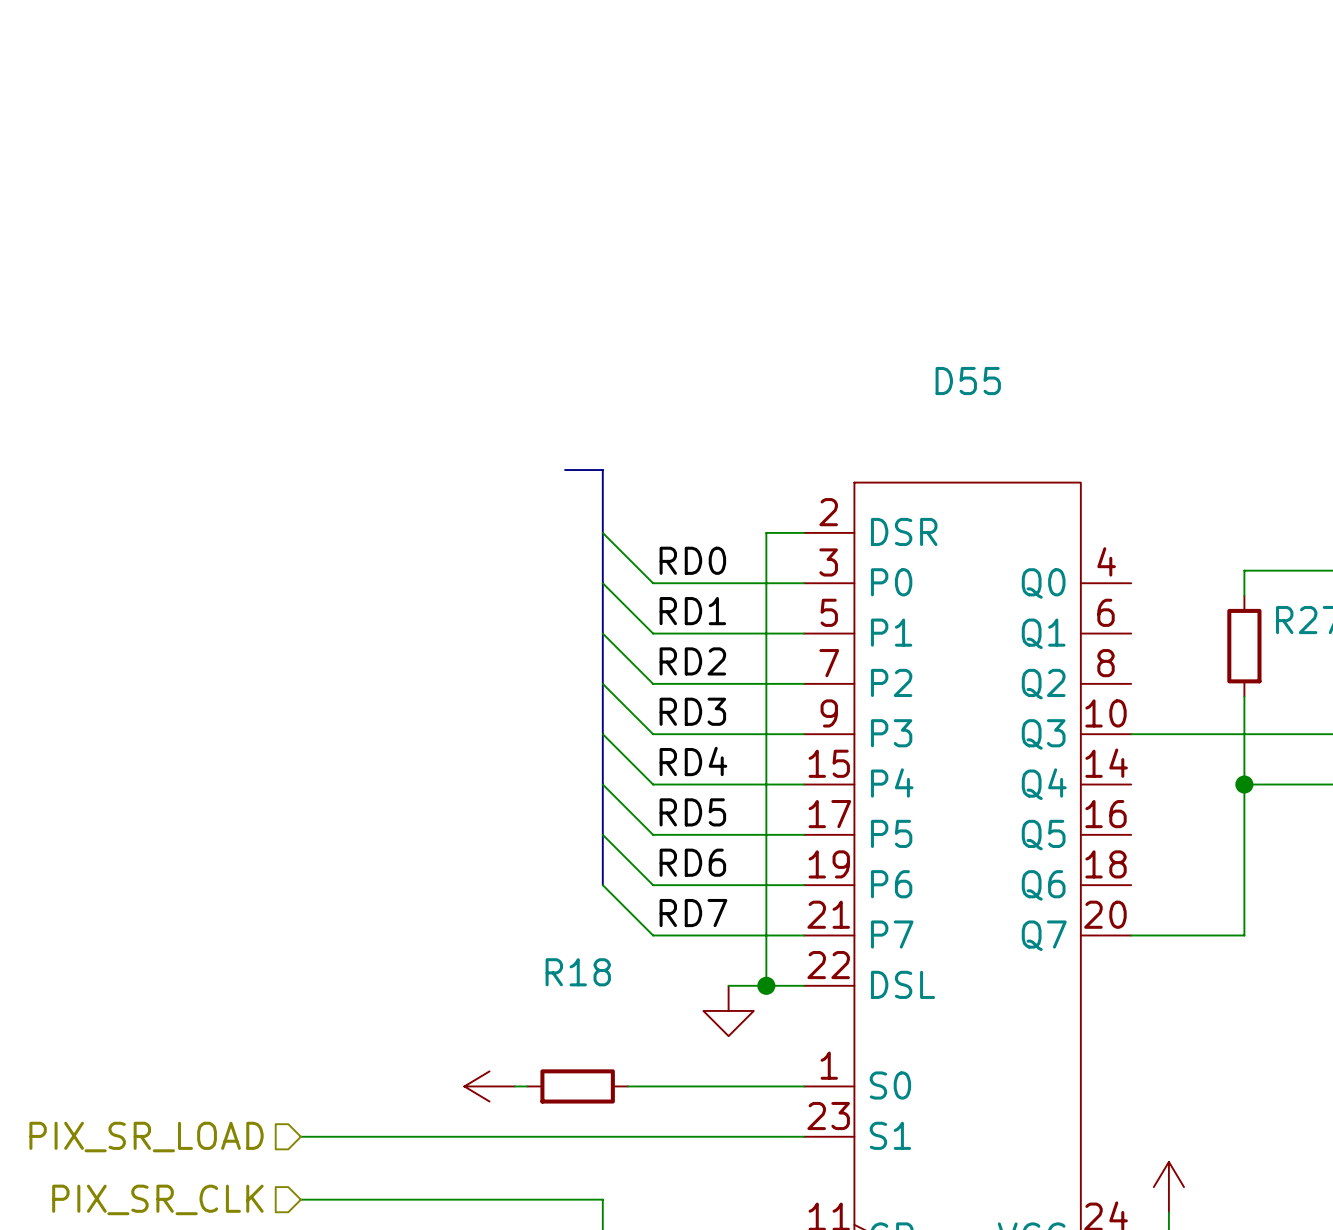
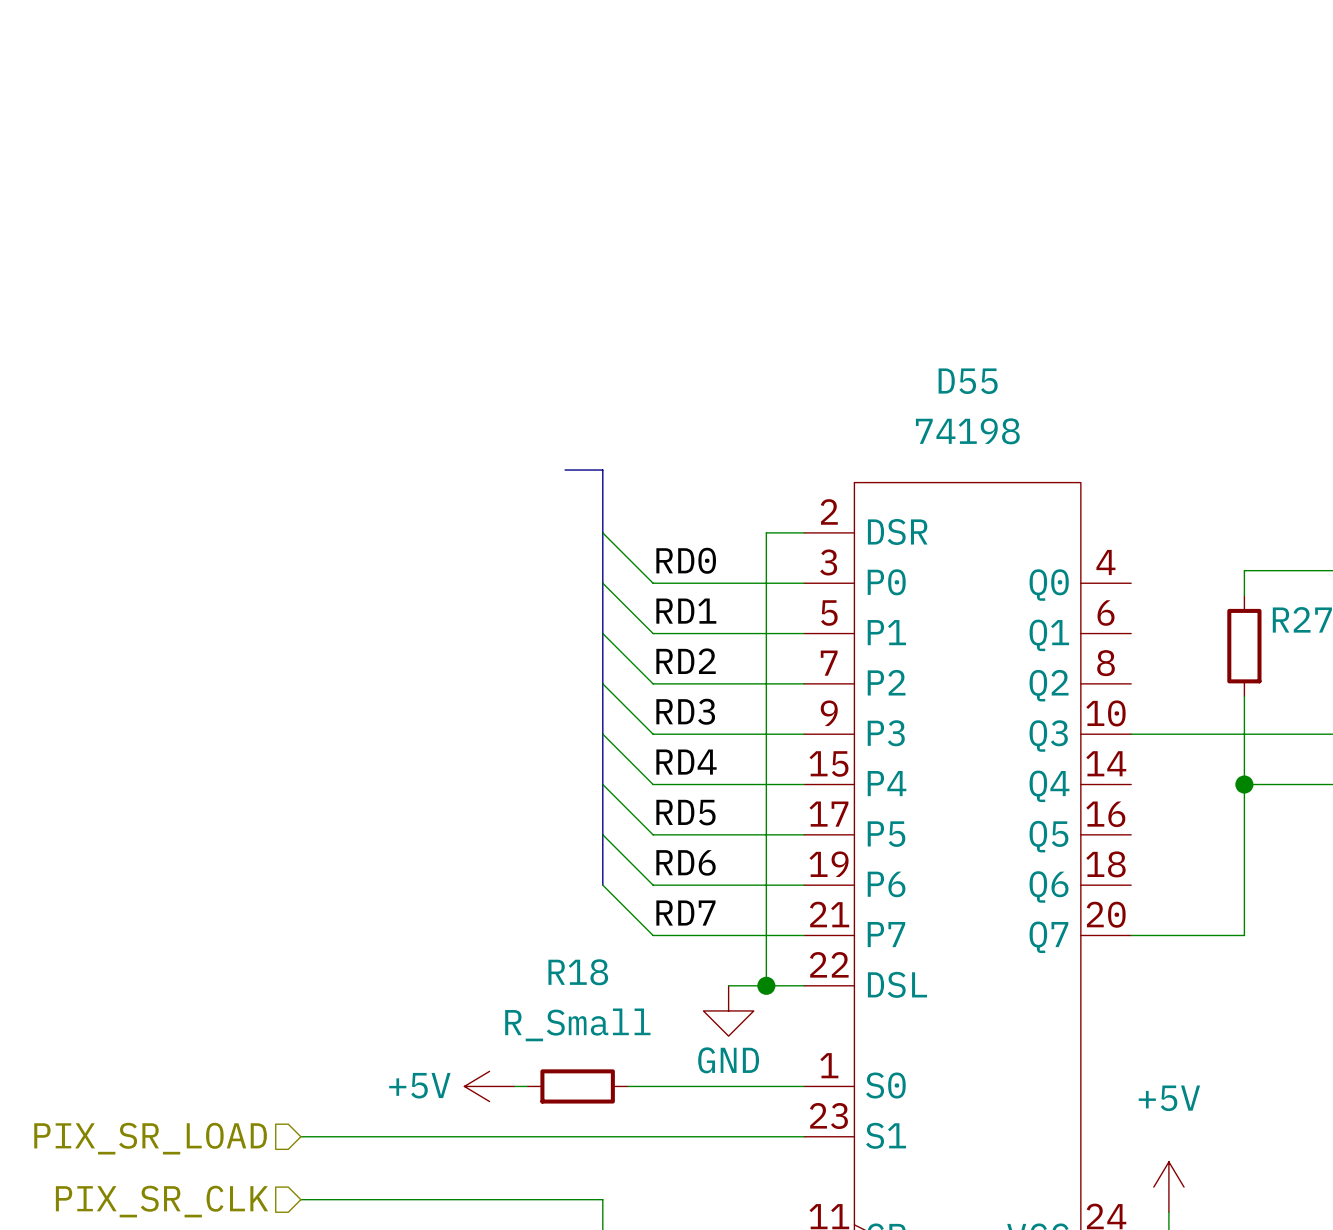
D55 value: none -> 74198 (967, 431)
R18 value: none -> R_Small (577, 1024)
power symbol text: none -> GND (728, 1060)
power symbol text: none -> +5V (419, 1085)
power symbol text: none -> +5V (1169, 1098)

